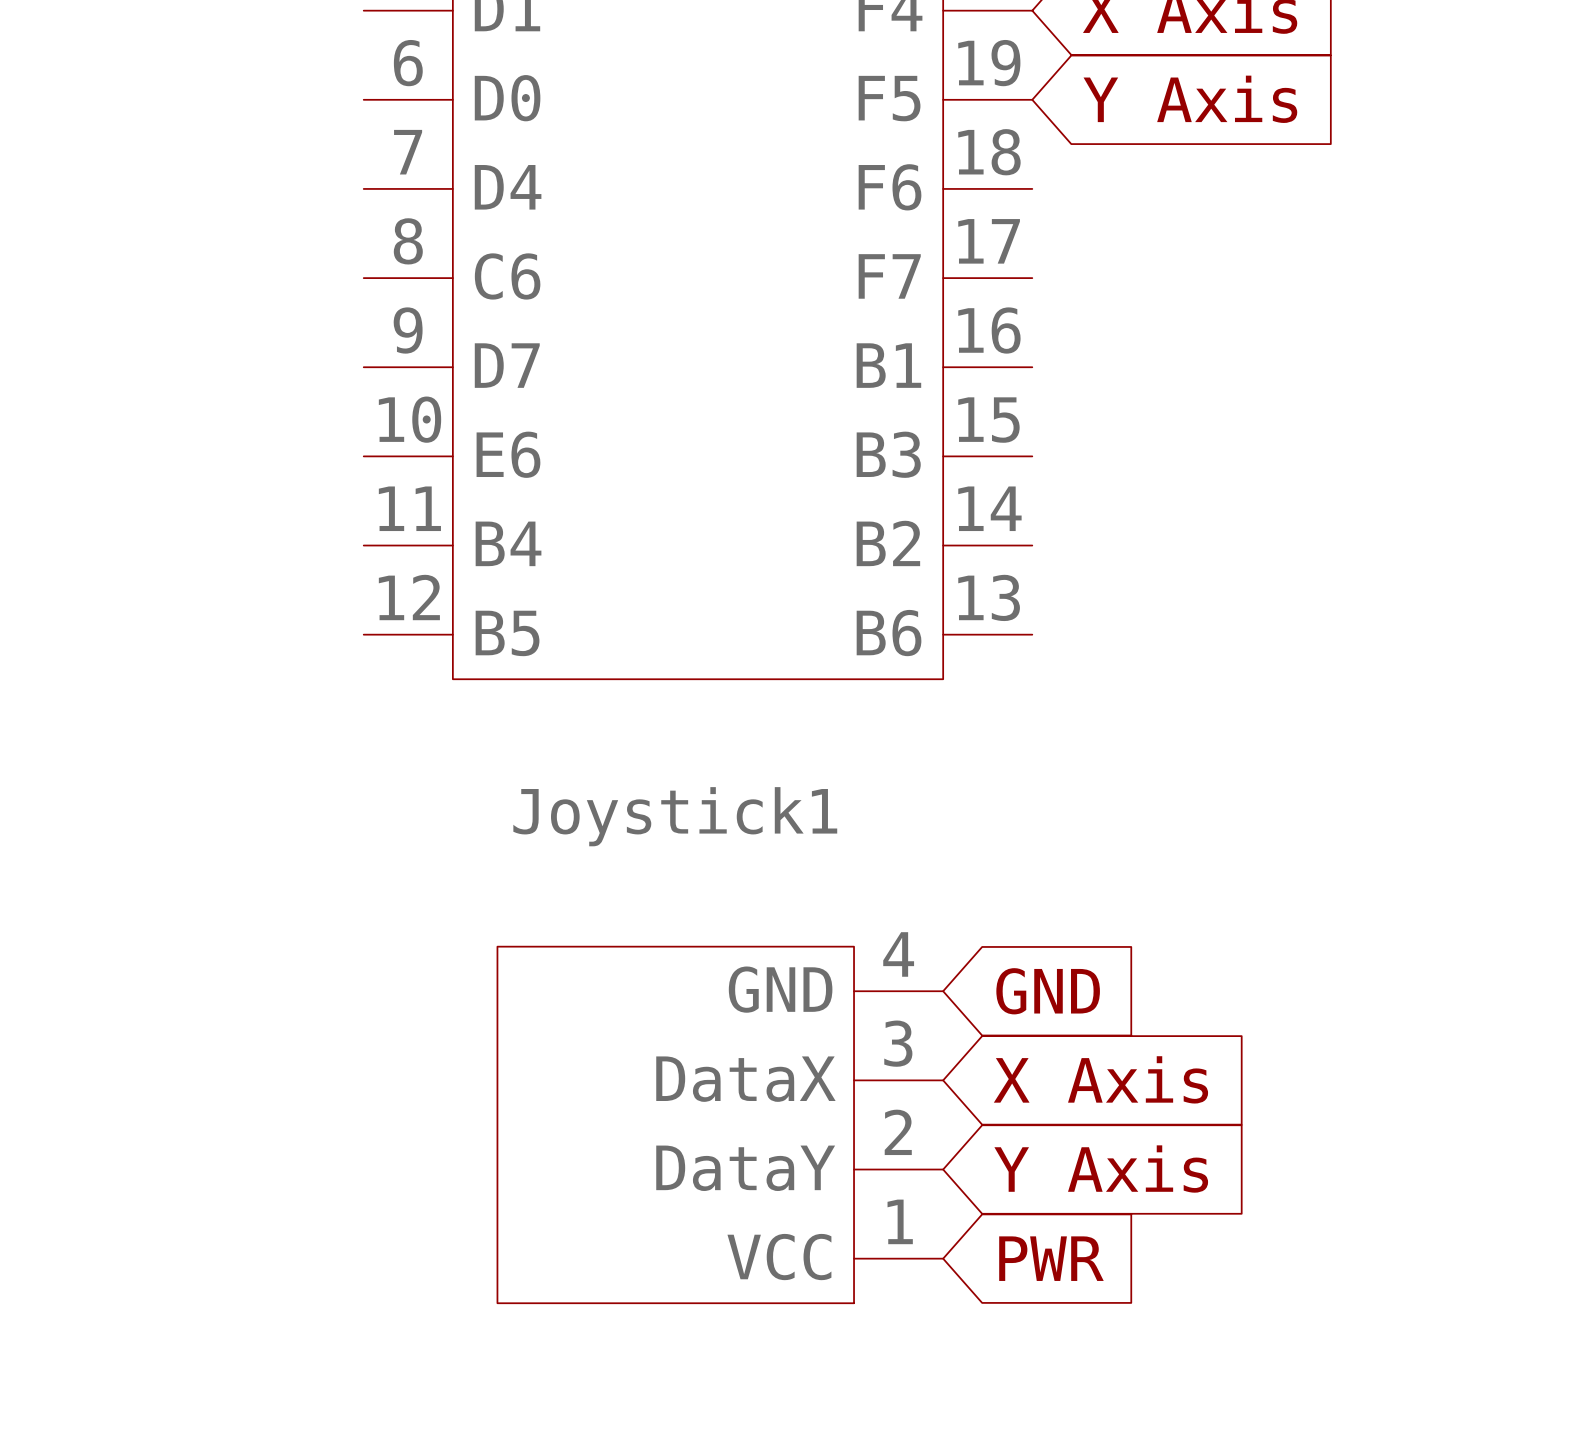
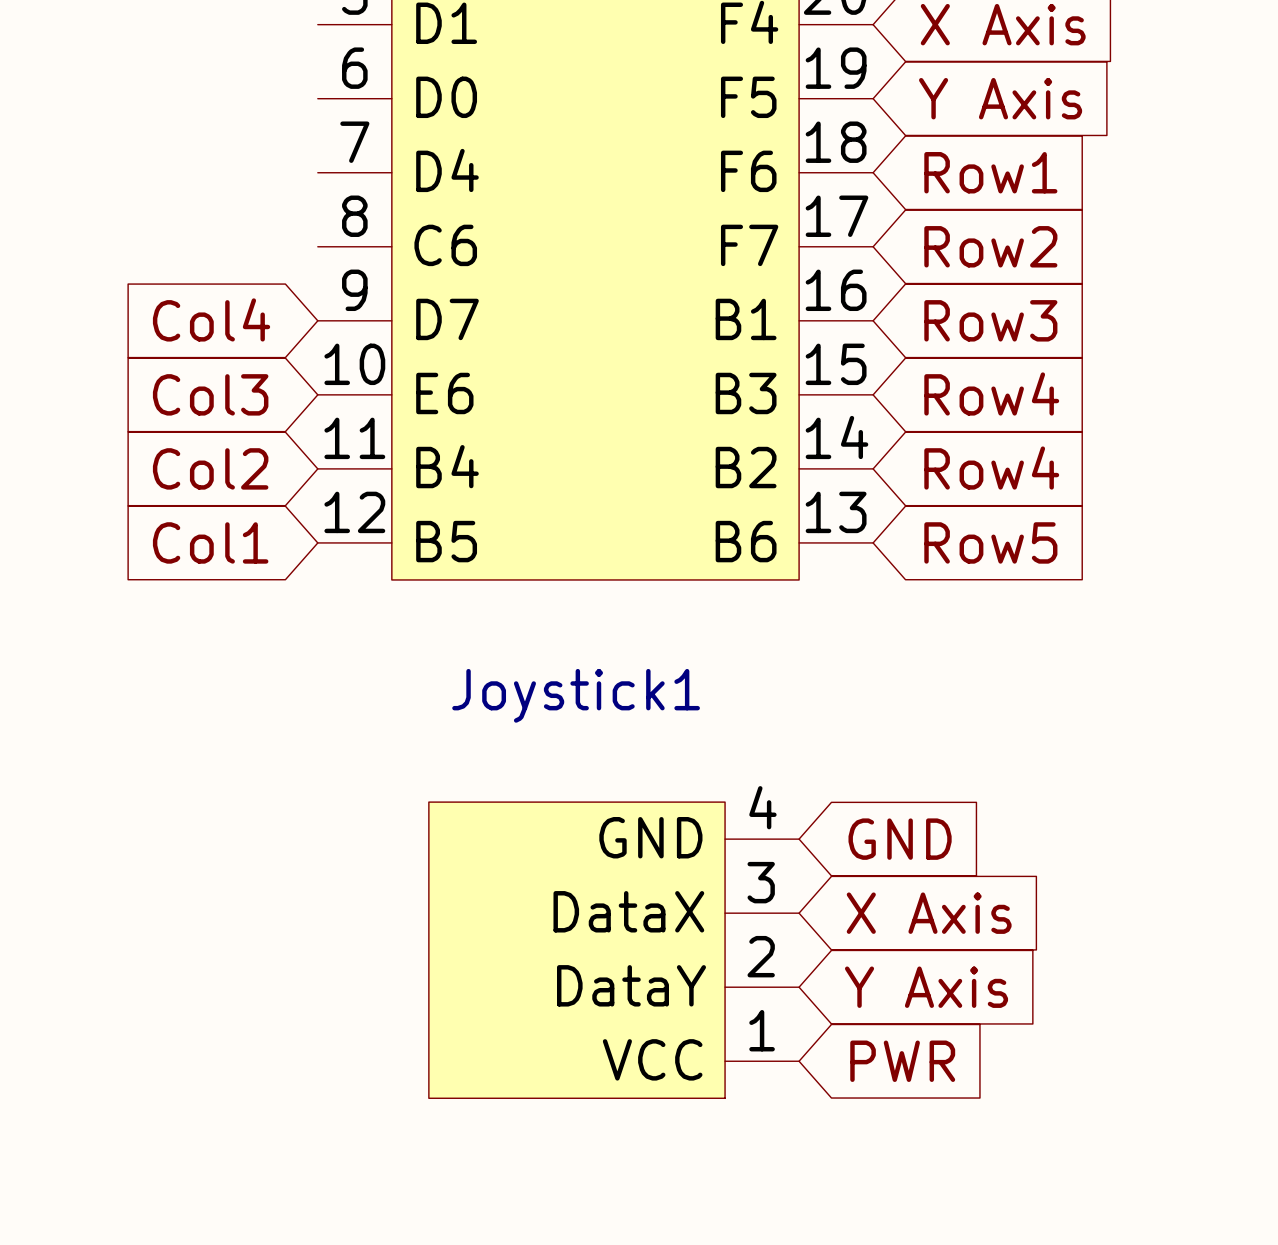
global label: none -> Row1 (990, 172)
global label: none -> Row2 (990, 246)
global label: none -> Col4 (211, 319)
global label: none -> Row3 (990, 320)
global label: none -> Col3 (210, 394)
global label: none -> Row4 (991, 393)
global label: none -> Col2 (210, 468)
global label: none -> Row4 (991, 468)
global label: none -> Col1 (210, 542)
global label: none -> Row5 (990, 542)

